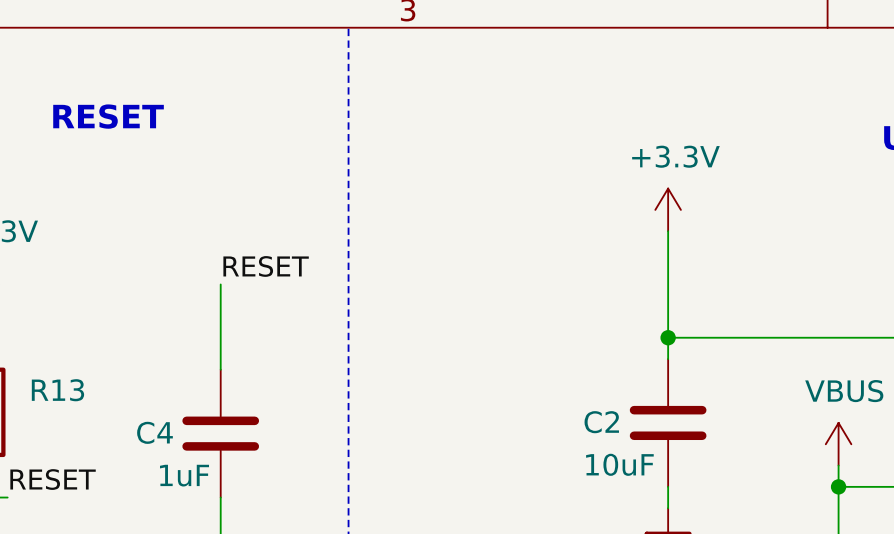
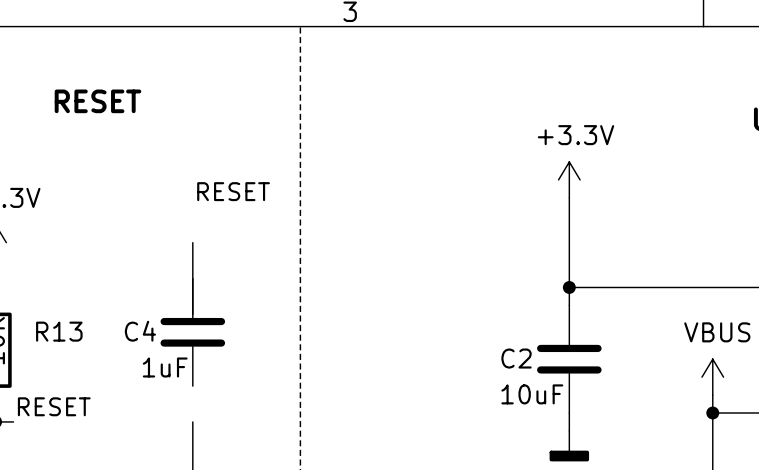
label position: RESET (266, 266) -> RESET (233, 191)
C4 position: (220, 433) -> (192, 332)

